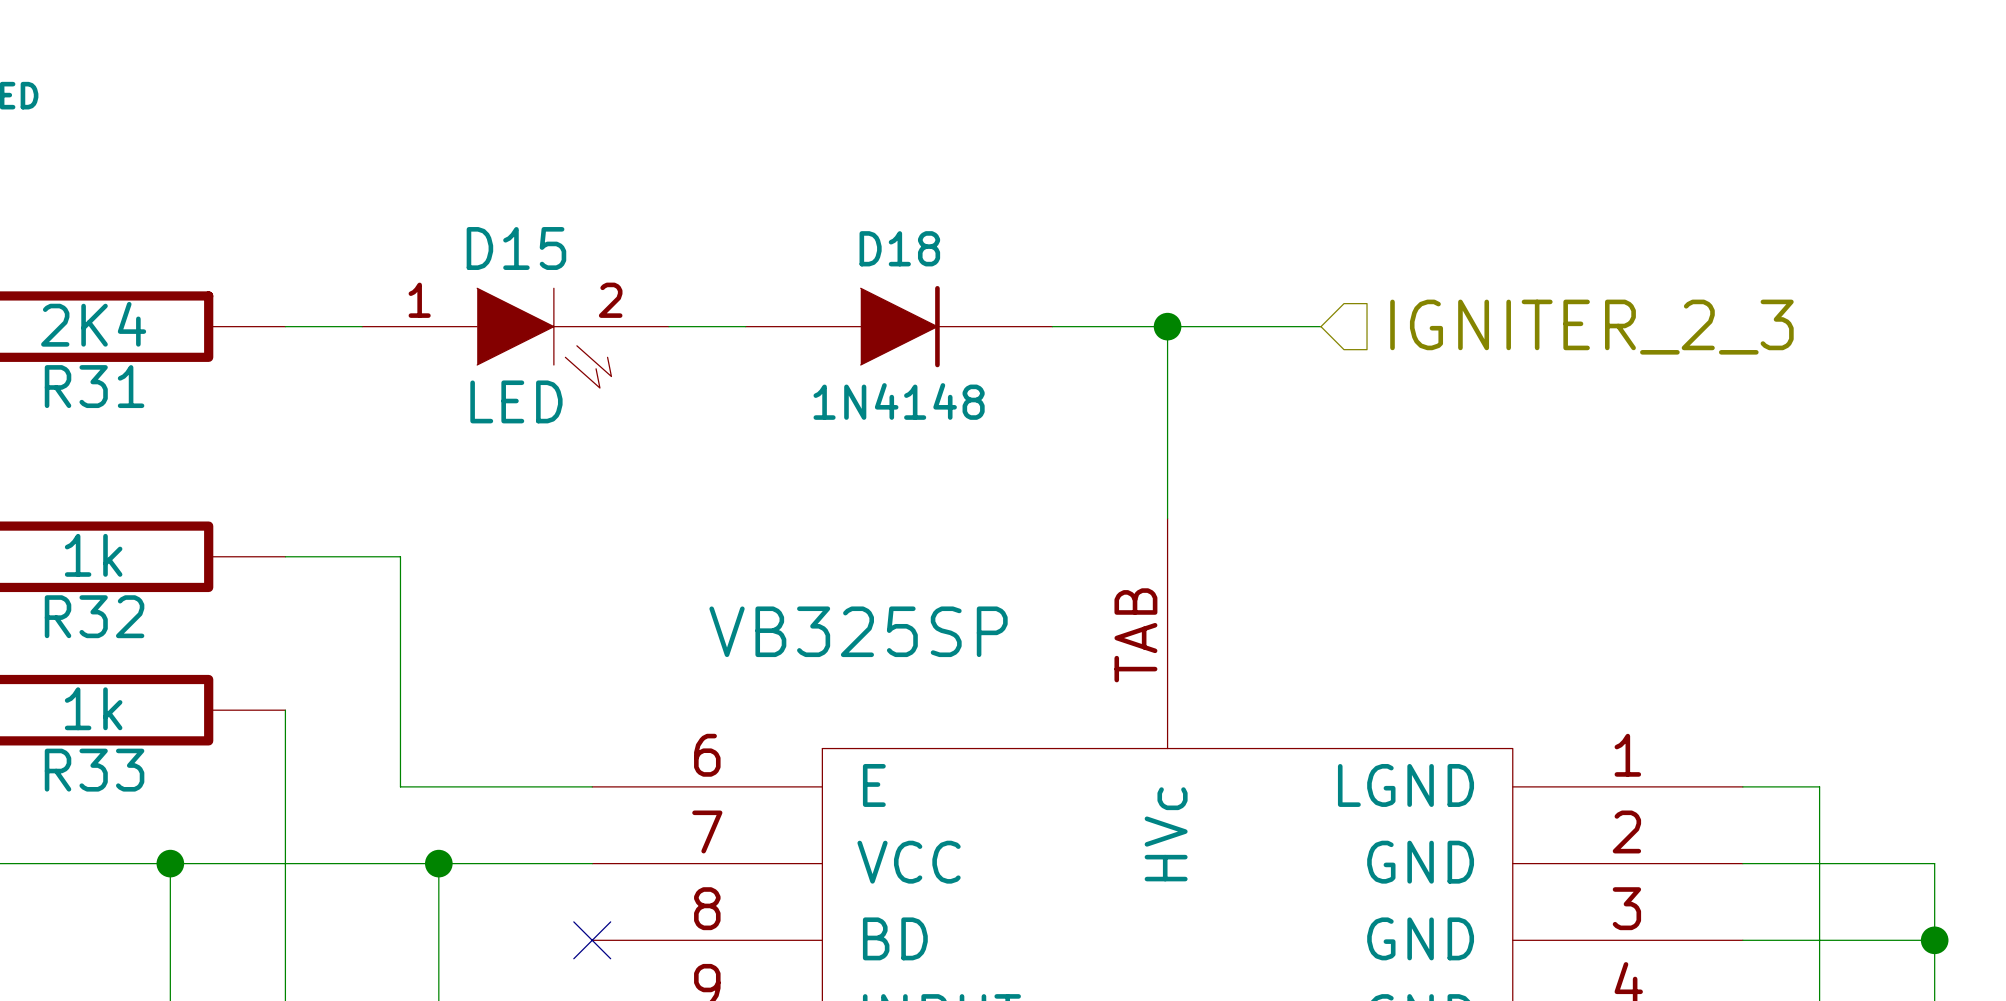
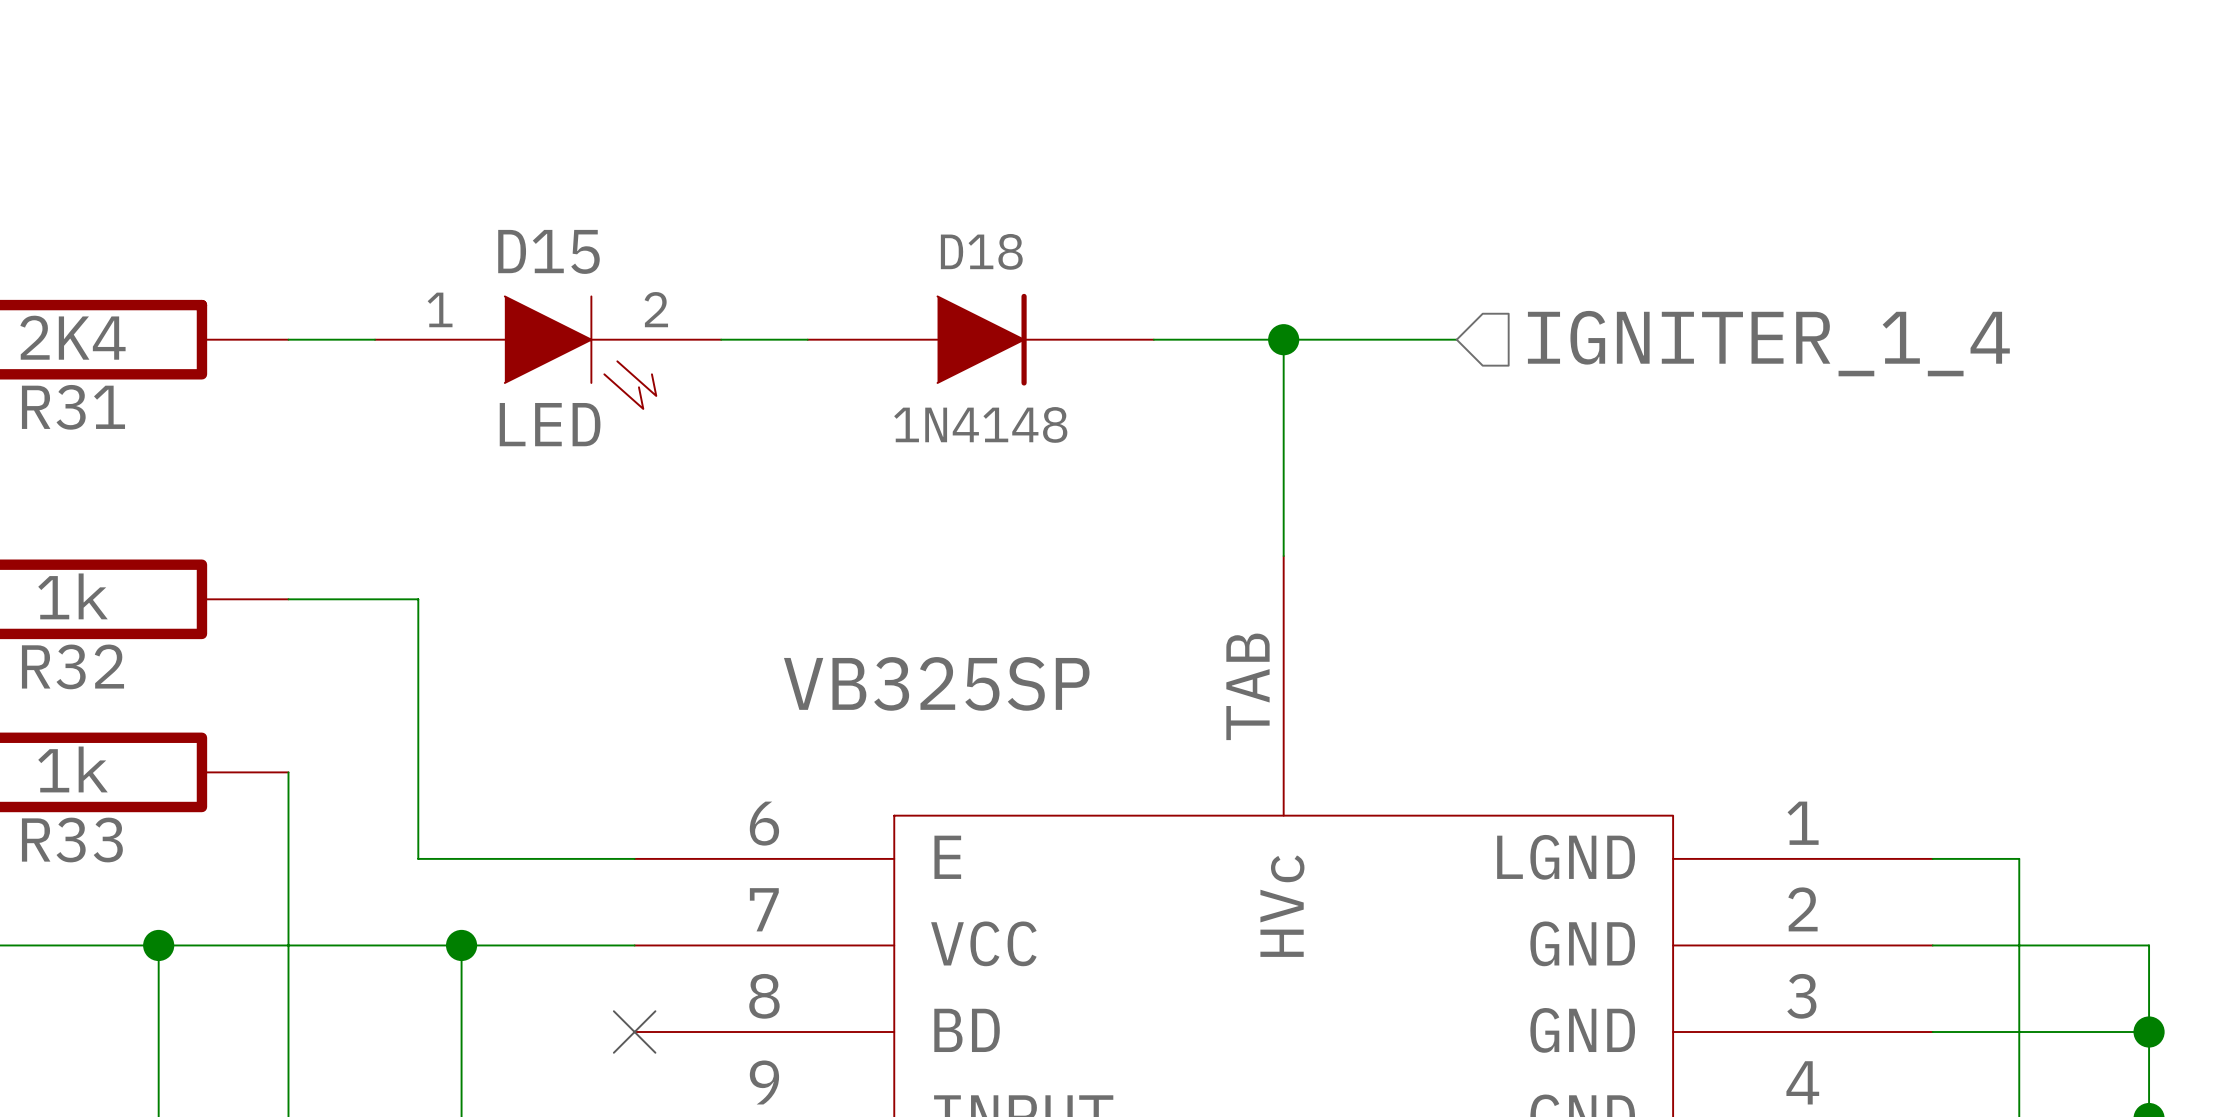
hierarchical label: IGNITER_2_3 (1591, 327) -> IGNITER_1_4 (1768, 343)

